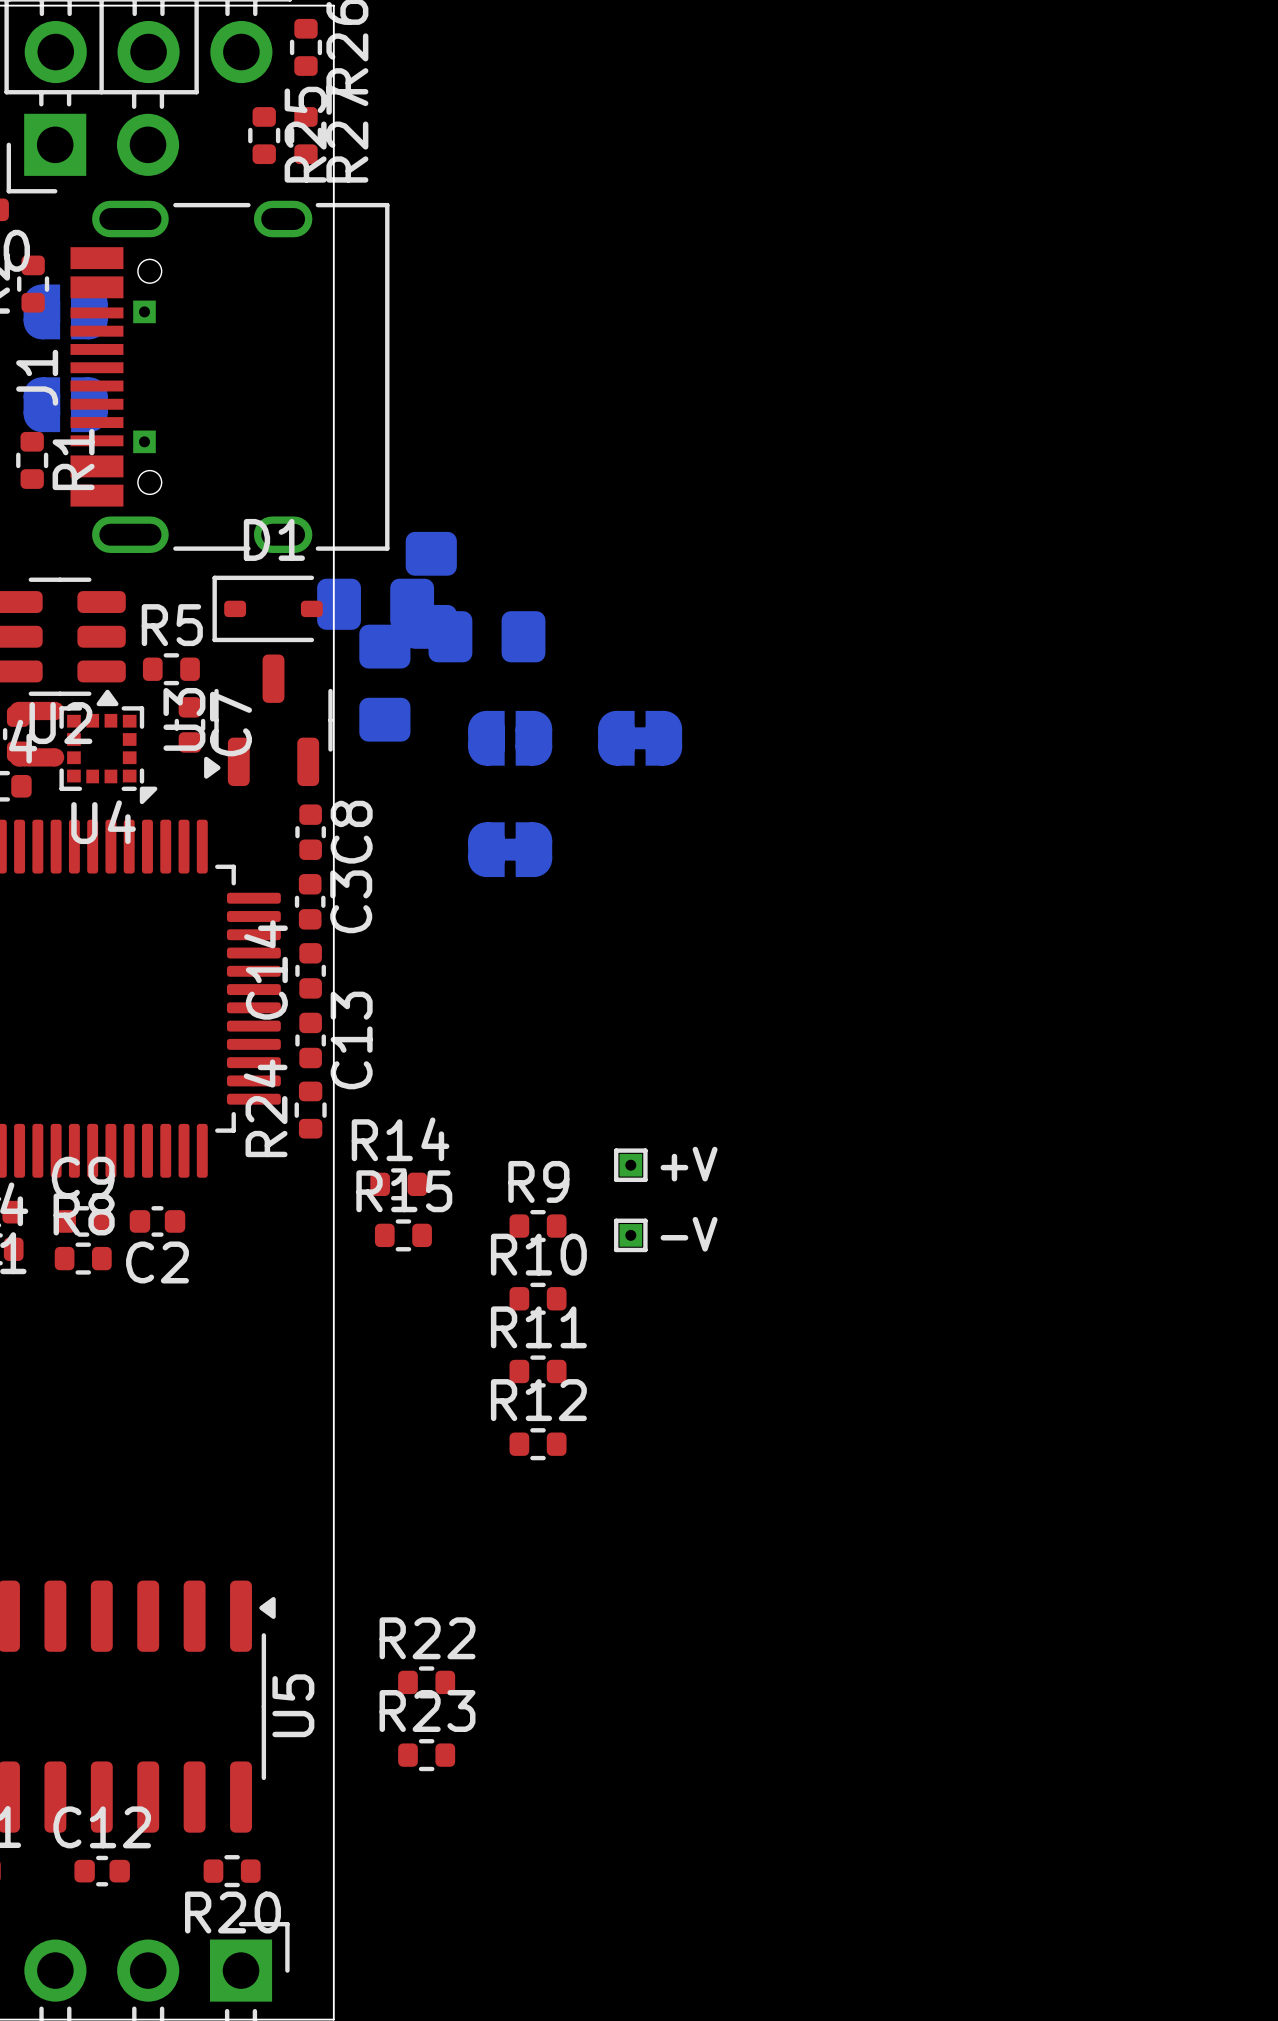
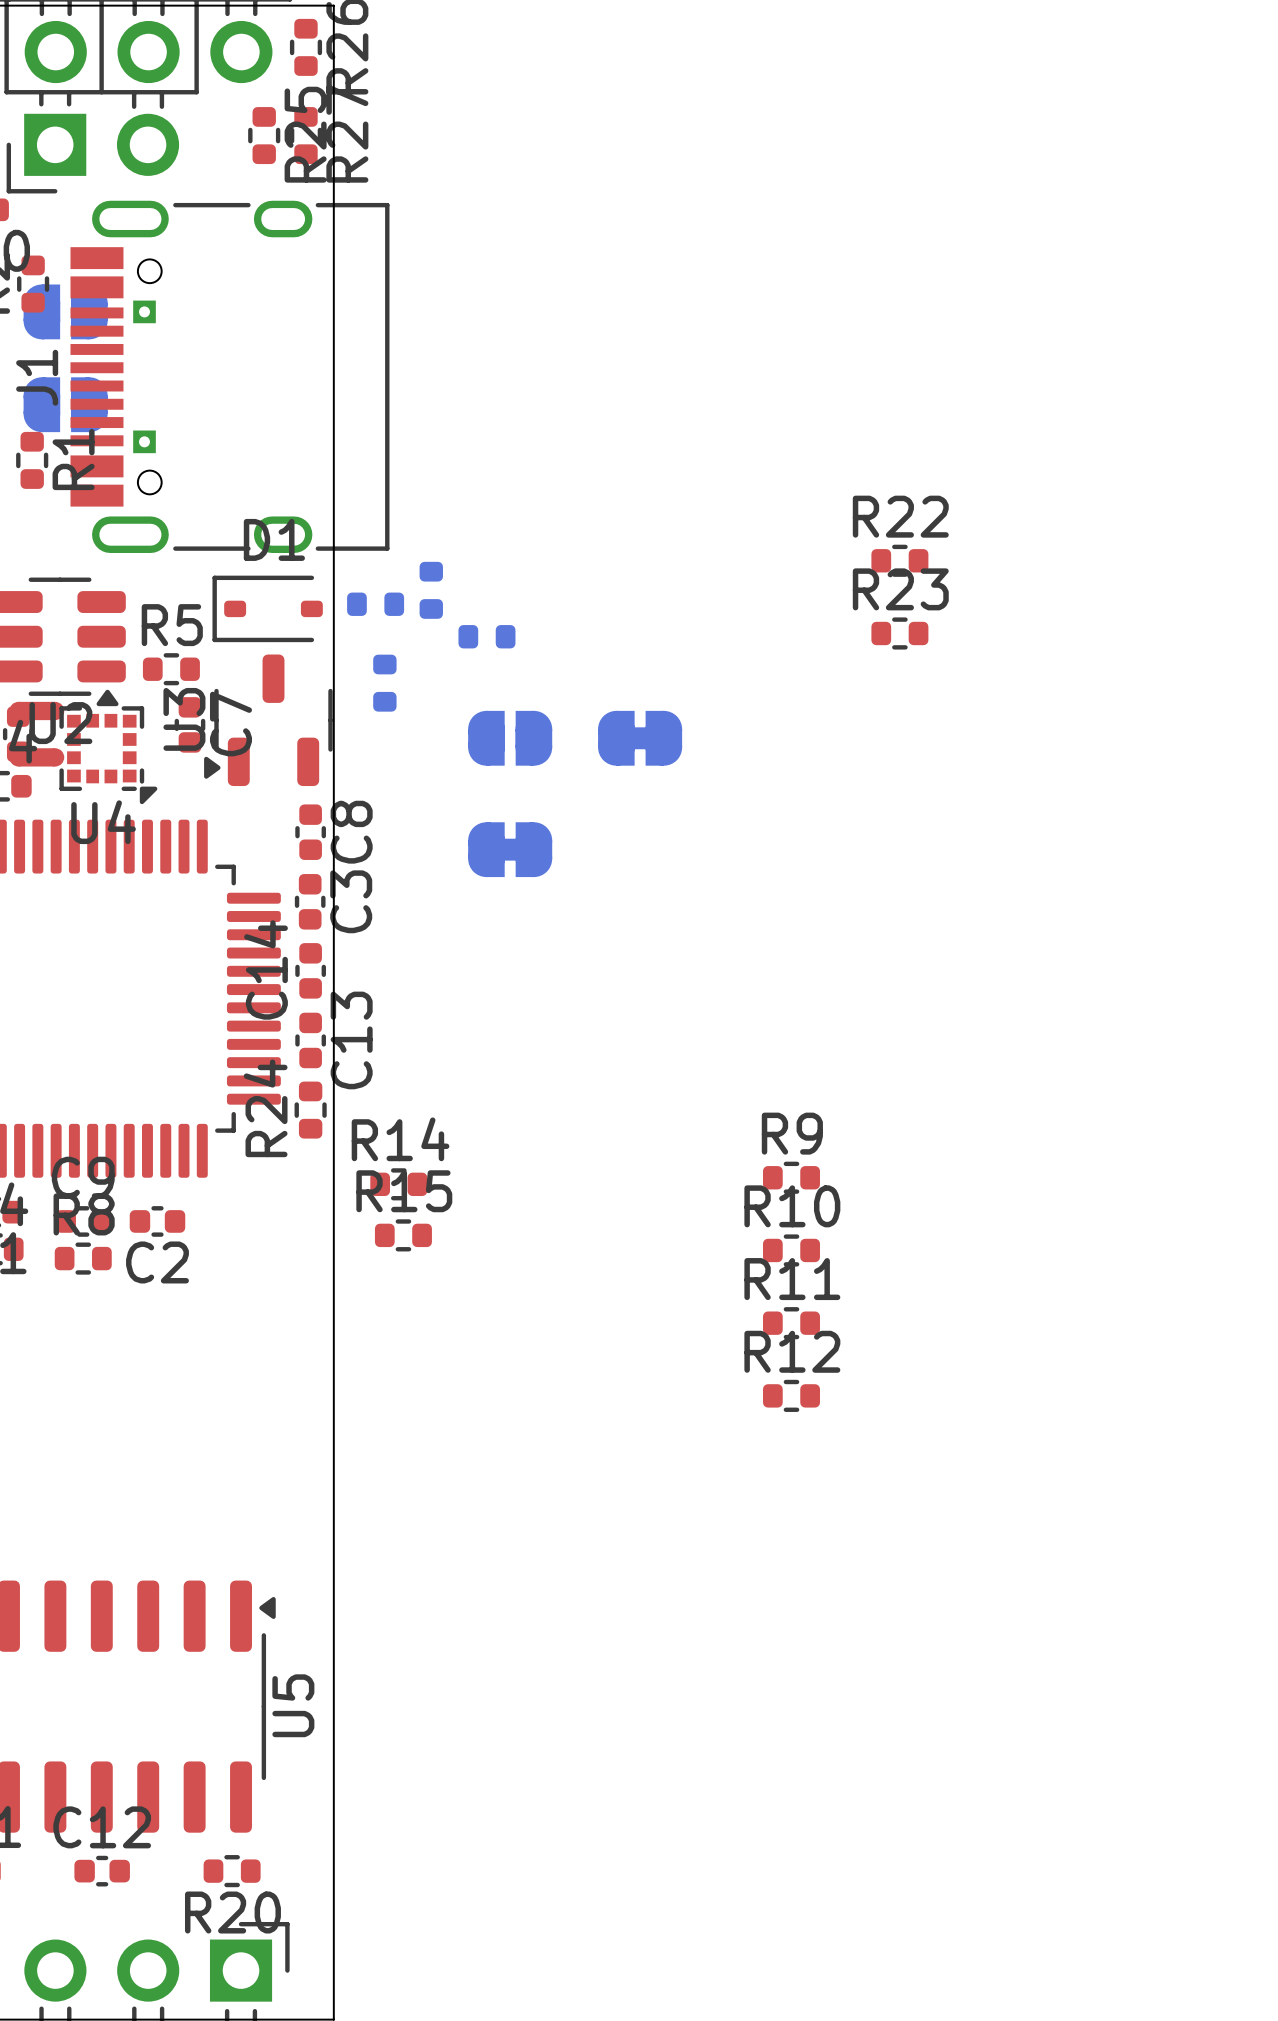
part footprint: [405, 531, 457, 649] -> [419, 561, 443, 619]
part footprint: [317, 578, 435, 630] -> [347, 592, 405, 616]
part footprint: [428, 611, 546, 663] -> [458, 625, 516, 649]
part footprint: [359, 624, 411, 742] -> [373, 654, 397, 712]
part: +V (630, 1165) -> none
R9 position: (538, 1226) -> (791, 1177)
part: -V (630, 1235) -> none
R10 position: (538, 1298) -> (791, 1250)
R11 position: (538, 1371) -> (791, 1323)
R12 position: (538, 1444) -> (791, 1395)
R22 position: (426, 1682) -> (899, 560)
R23 position: (426, 1755) -> (899, 633)

